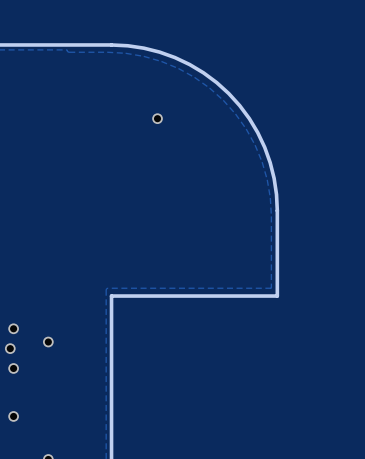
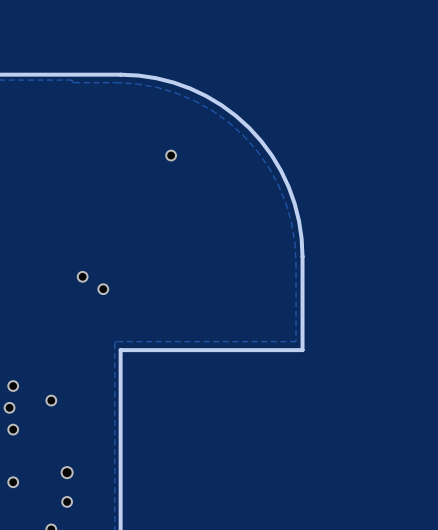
via: none -> (82, 276)
via: none -> (103, 289)
via: none -> (67, 472)
via: none -> (67, 501)

